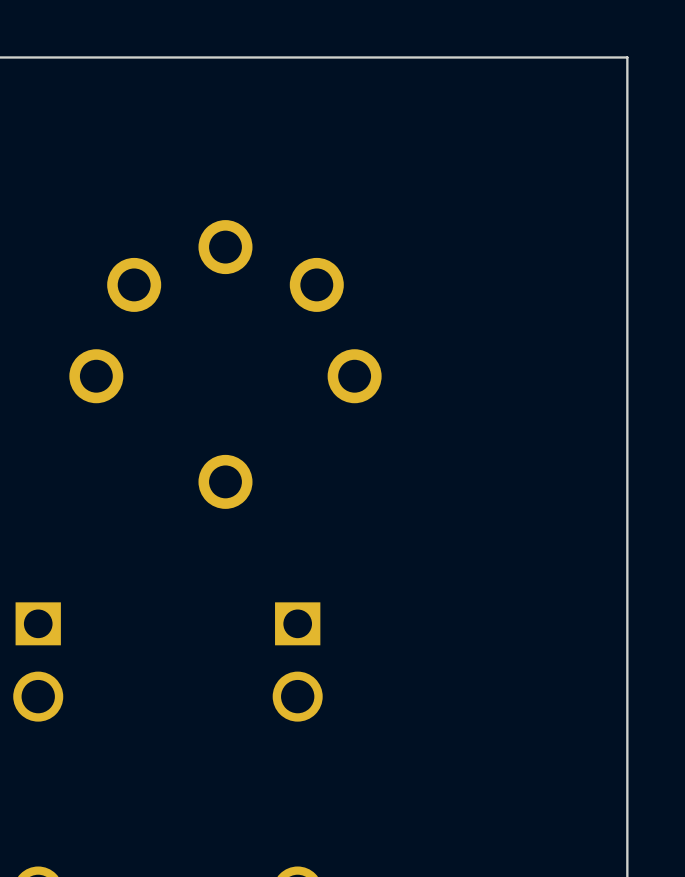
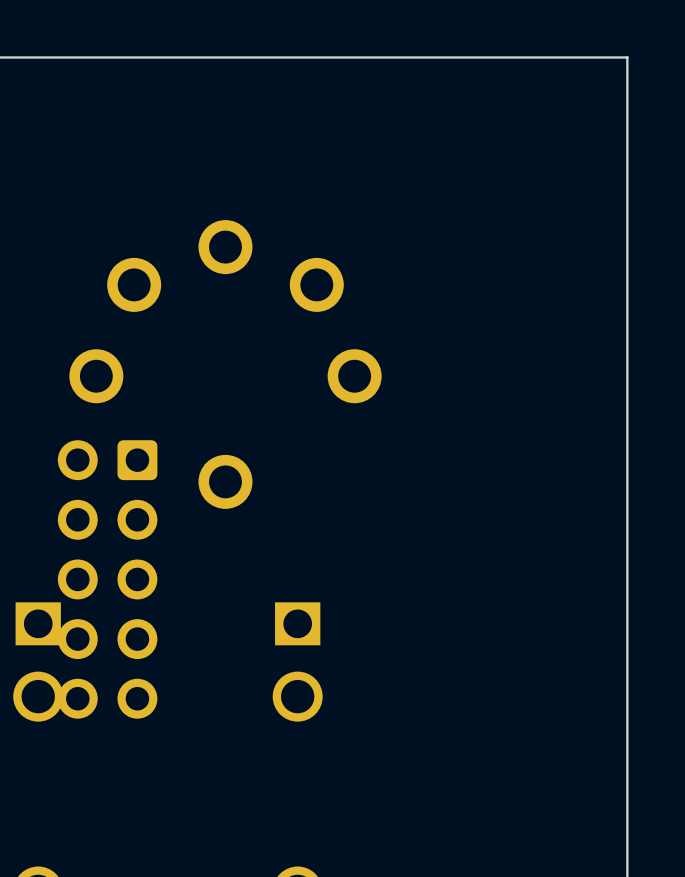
part: none -> (107, 579)

